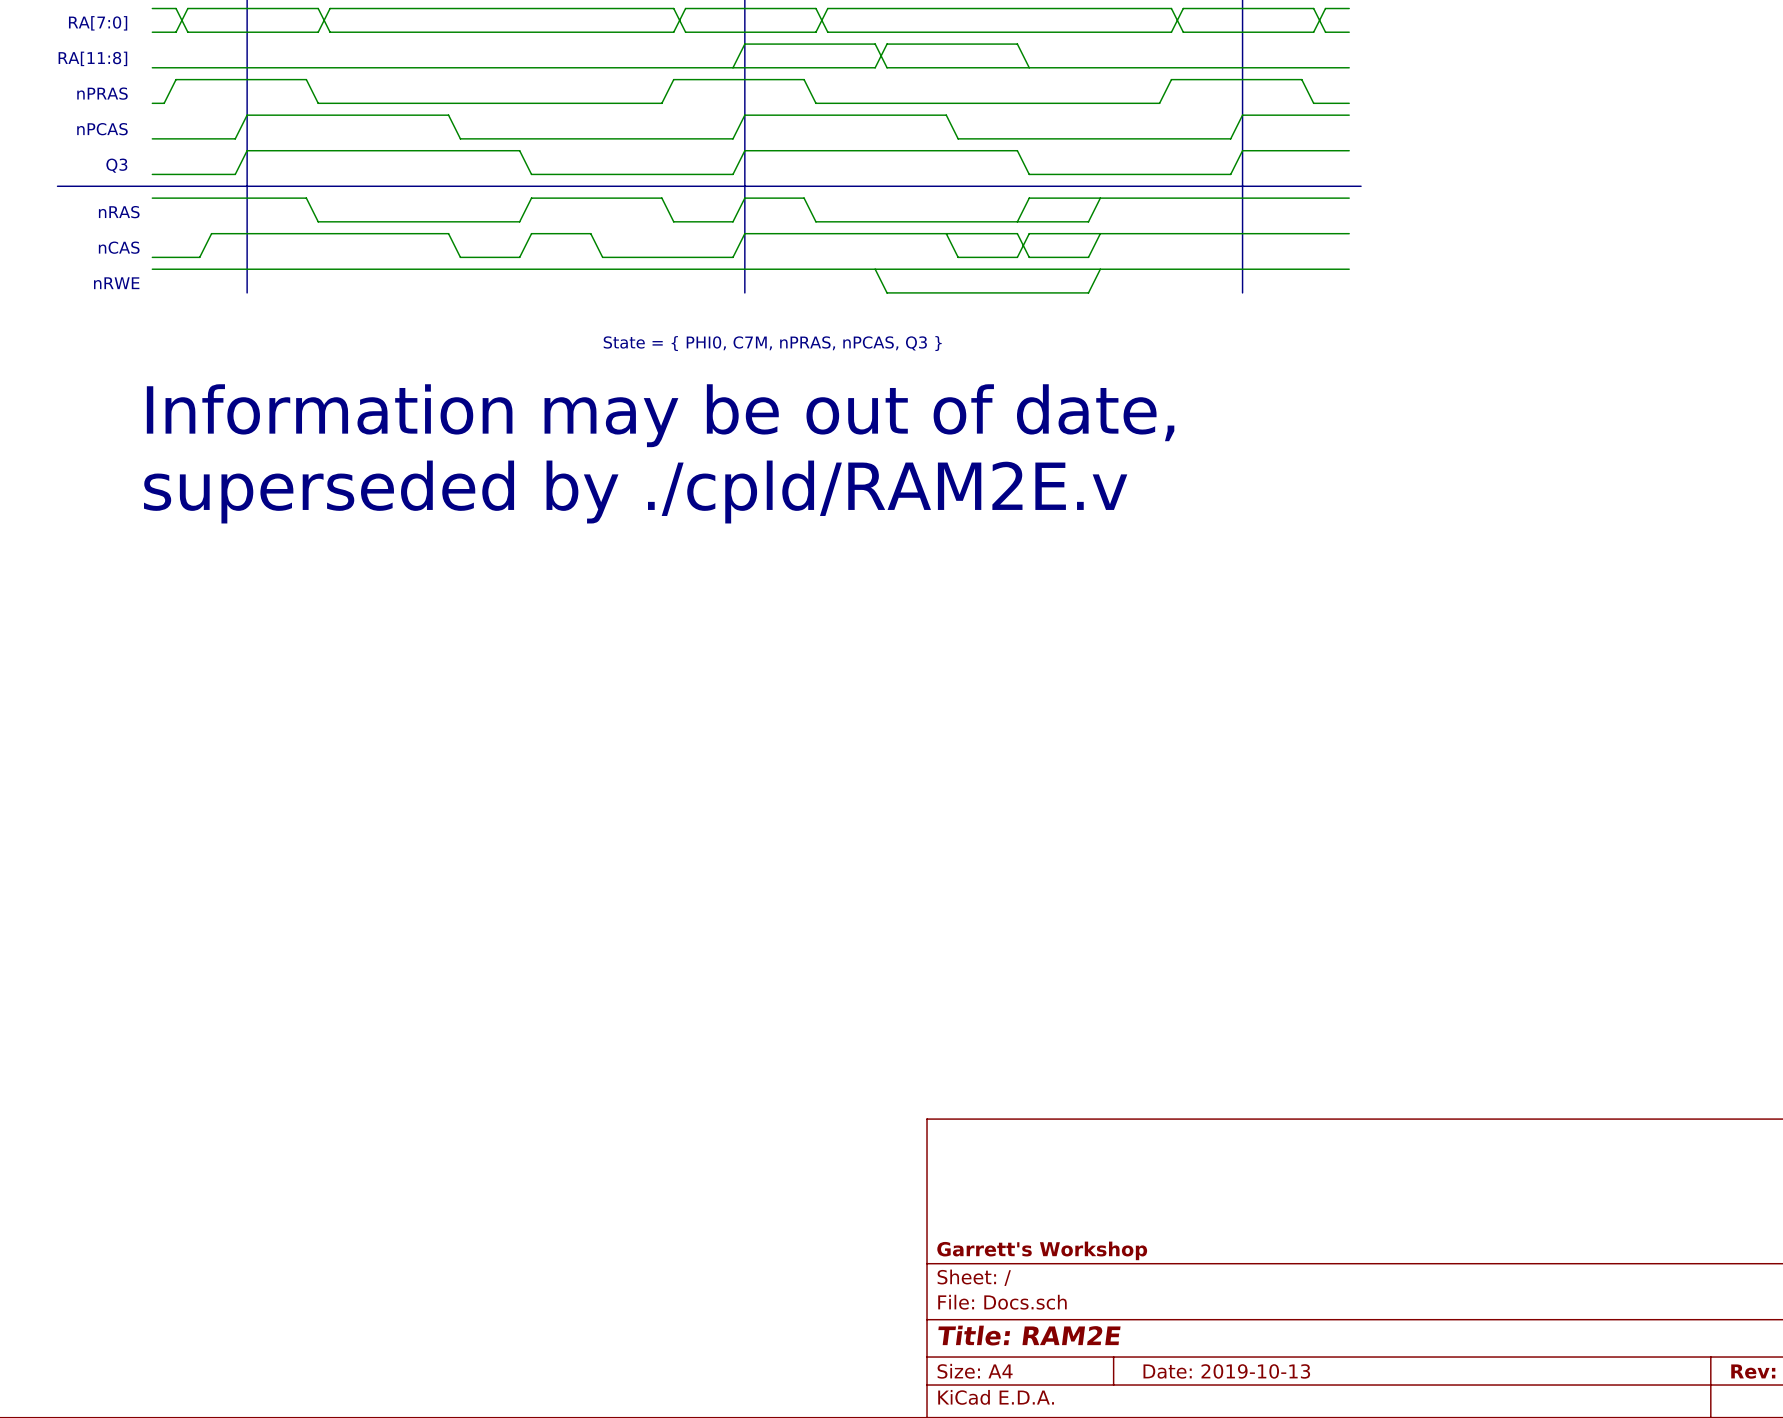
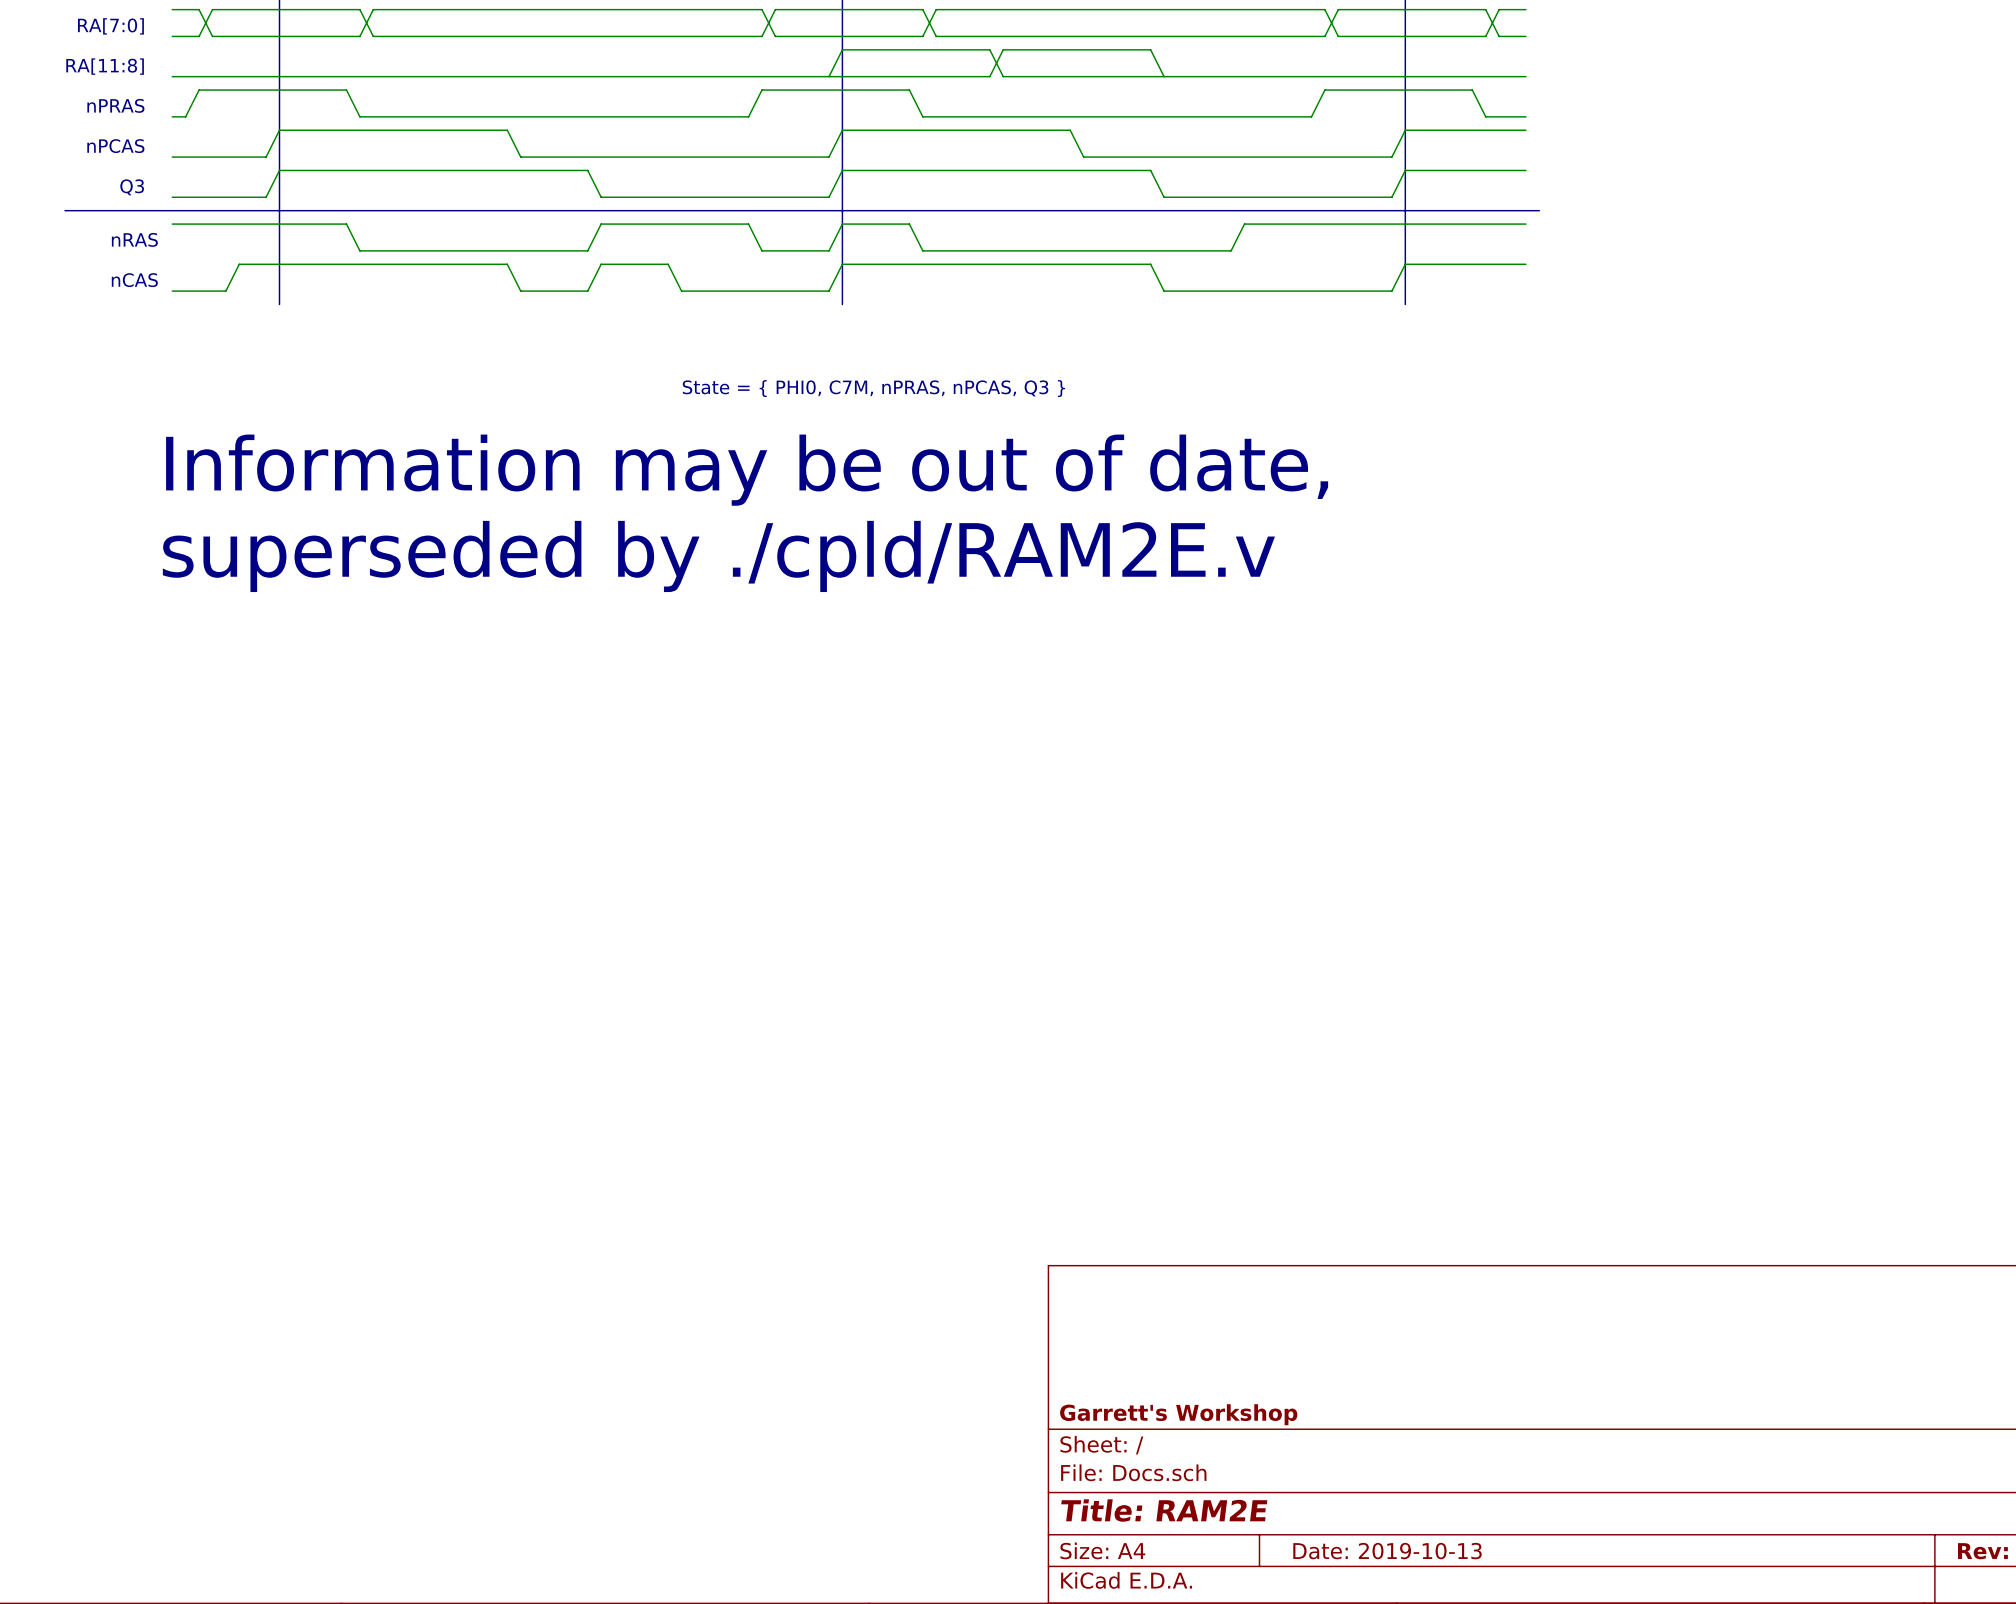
wire: (1100, 198) (1029, 198) (1017, 221) -> none
wire: (946, 233) (958, 257) (1017, 257) (1029, 233) (1242, 233) -> none
wire: (1100, 233) (1088, 257) -> (1405, 264) (1391, 291) (1231, 291)
wire: (152, 269) (1349, 269) -> none
bus: (247, 269) (247, 292) -> none
bus: (744, 269) (744, 292) -> none
wire: (875, 269) (887, 292) (1088, 292) (1100, 269) -> none
bus: (1242, 269) (1242, 292) -> none
text: nRWE (116, 283) -> none

